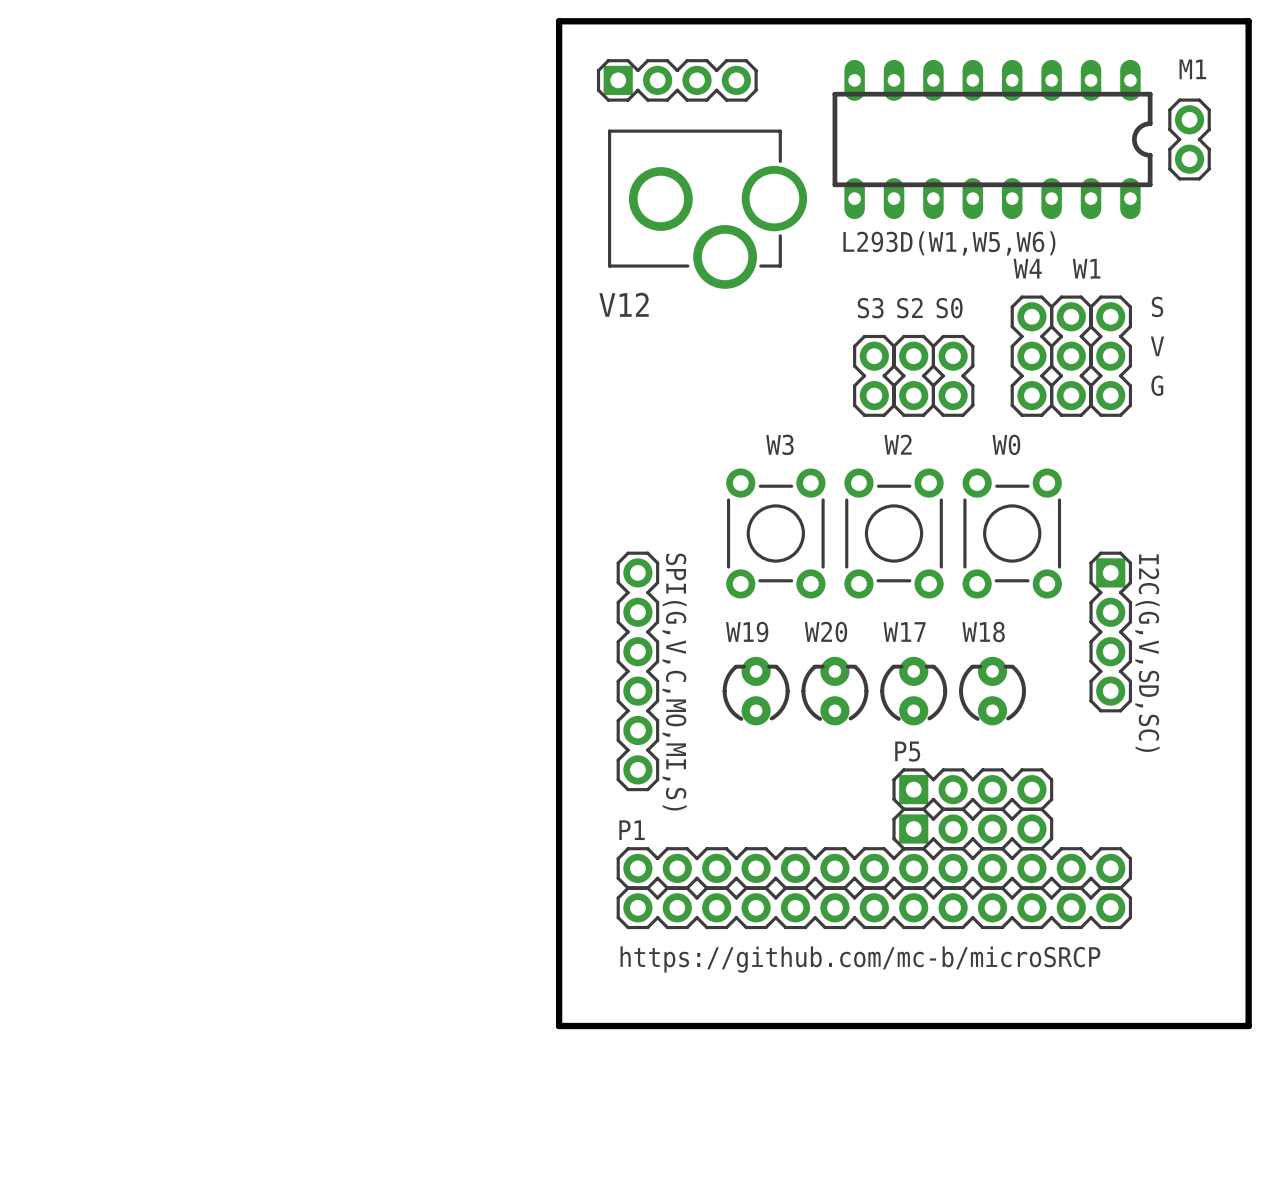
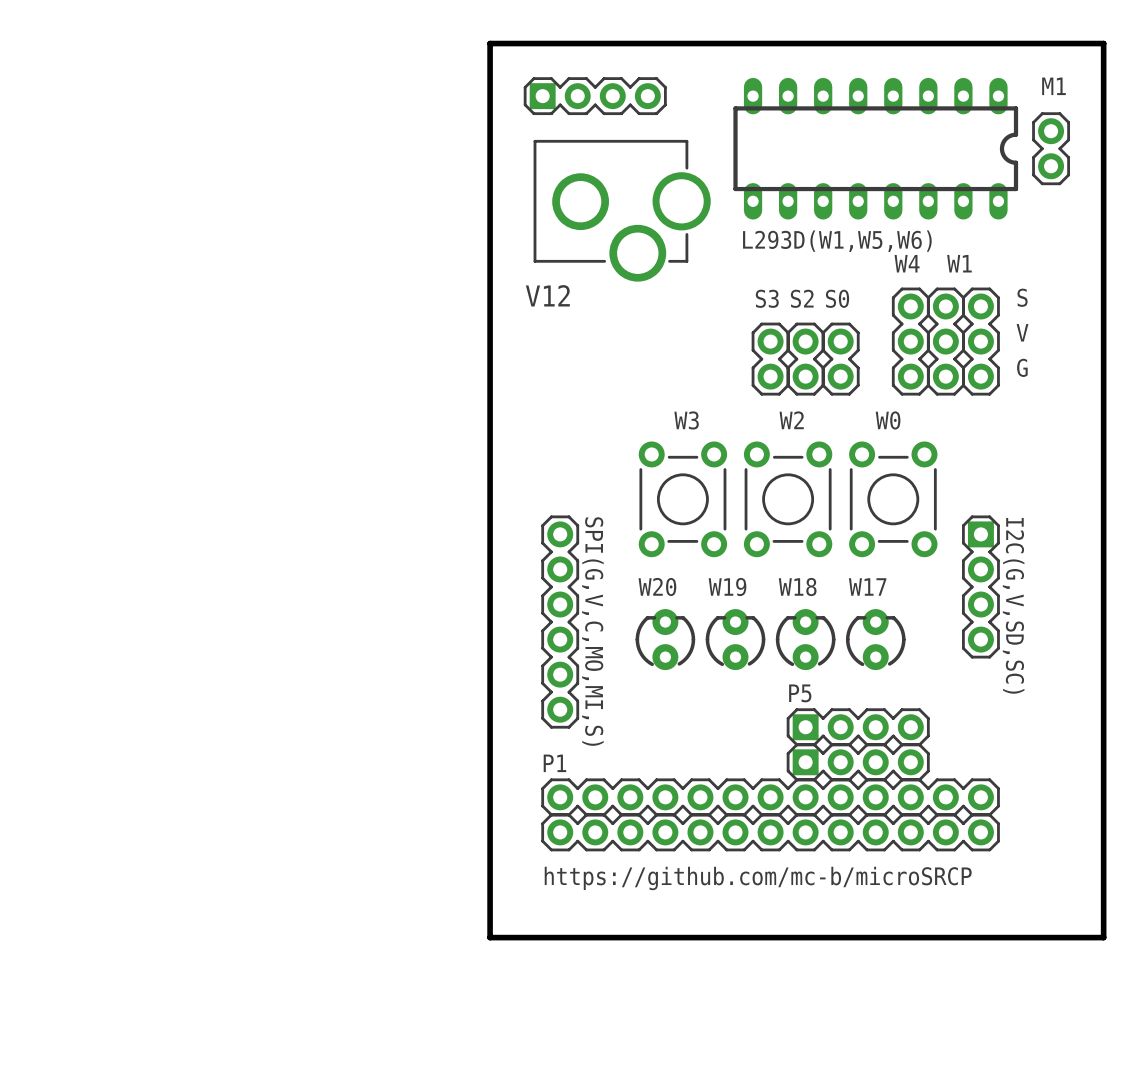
W19 name: W19 (747, 632) -> W20 (657, 587)
W20 name: W20 (825, 632) -> W19 (727, 587)
W17 name: W17 (904, 632) -> W18 (797, 587)
W18 name: W18 (983, 632) -> W17 (867, 586)

